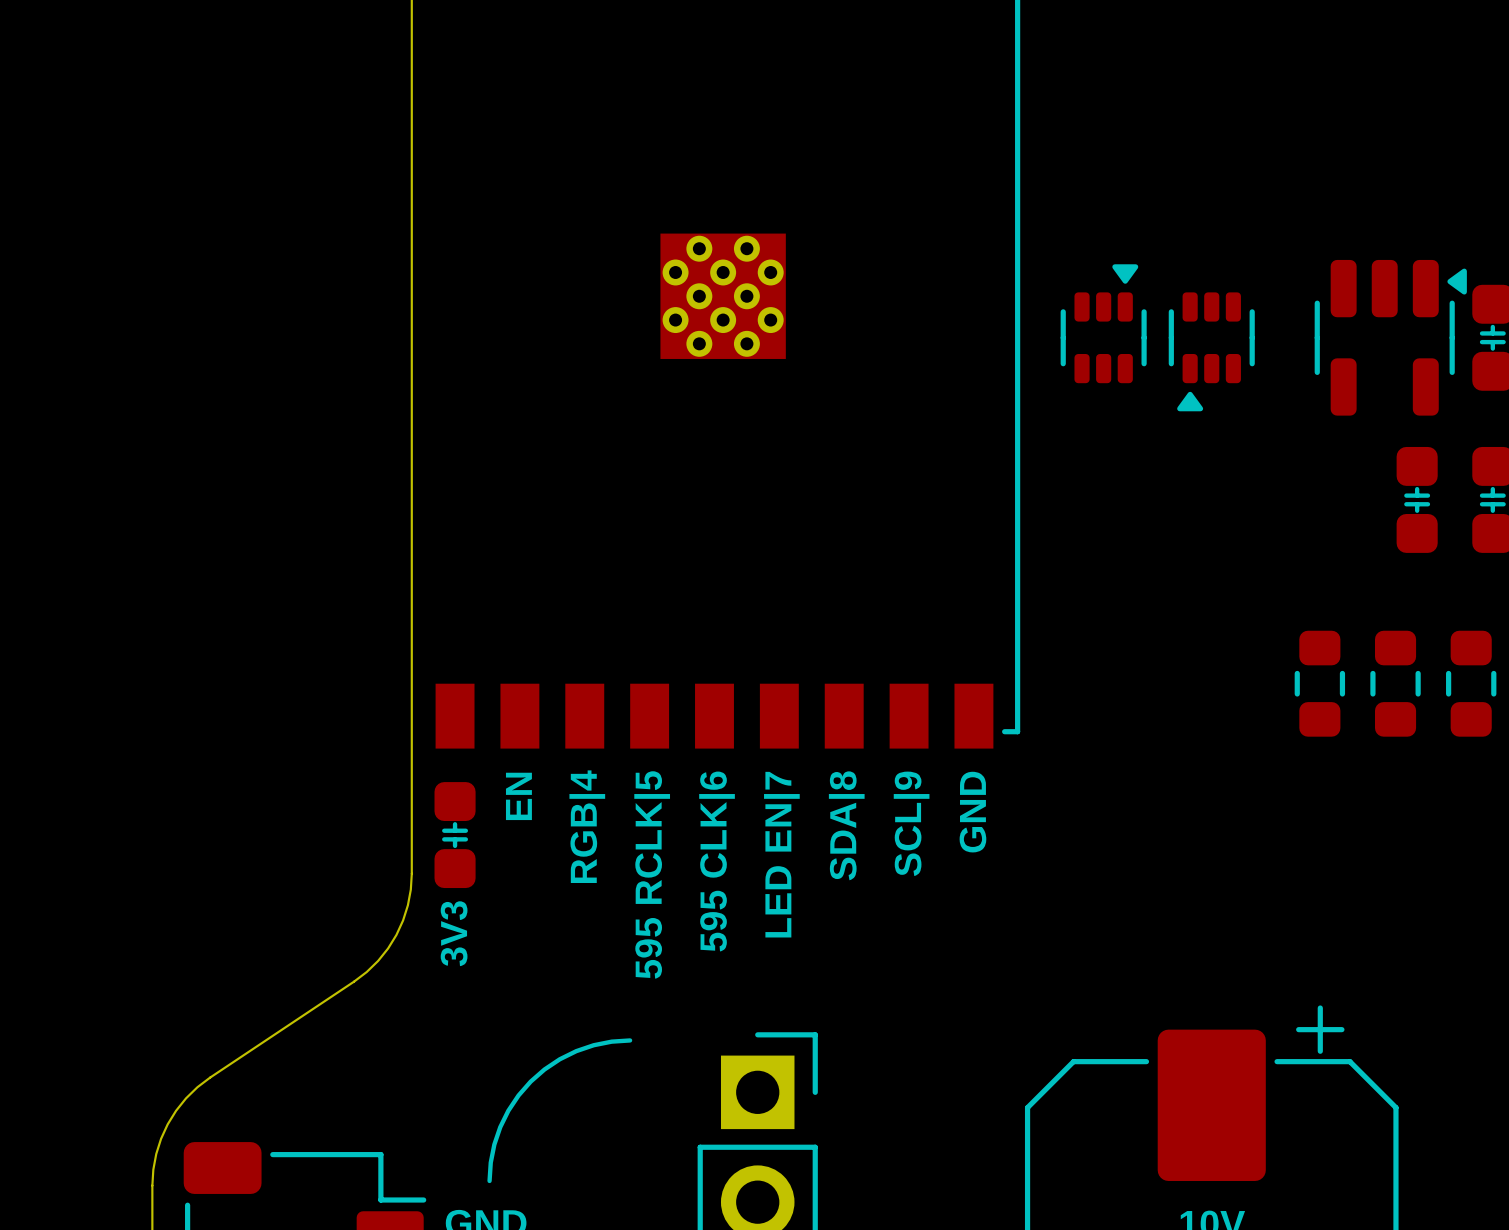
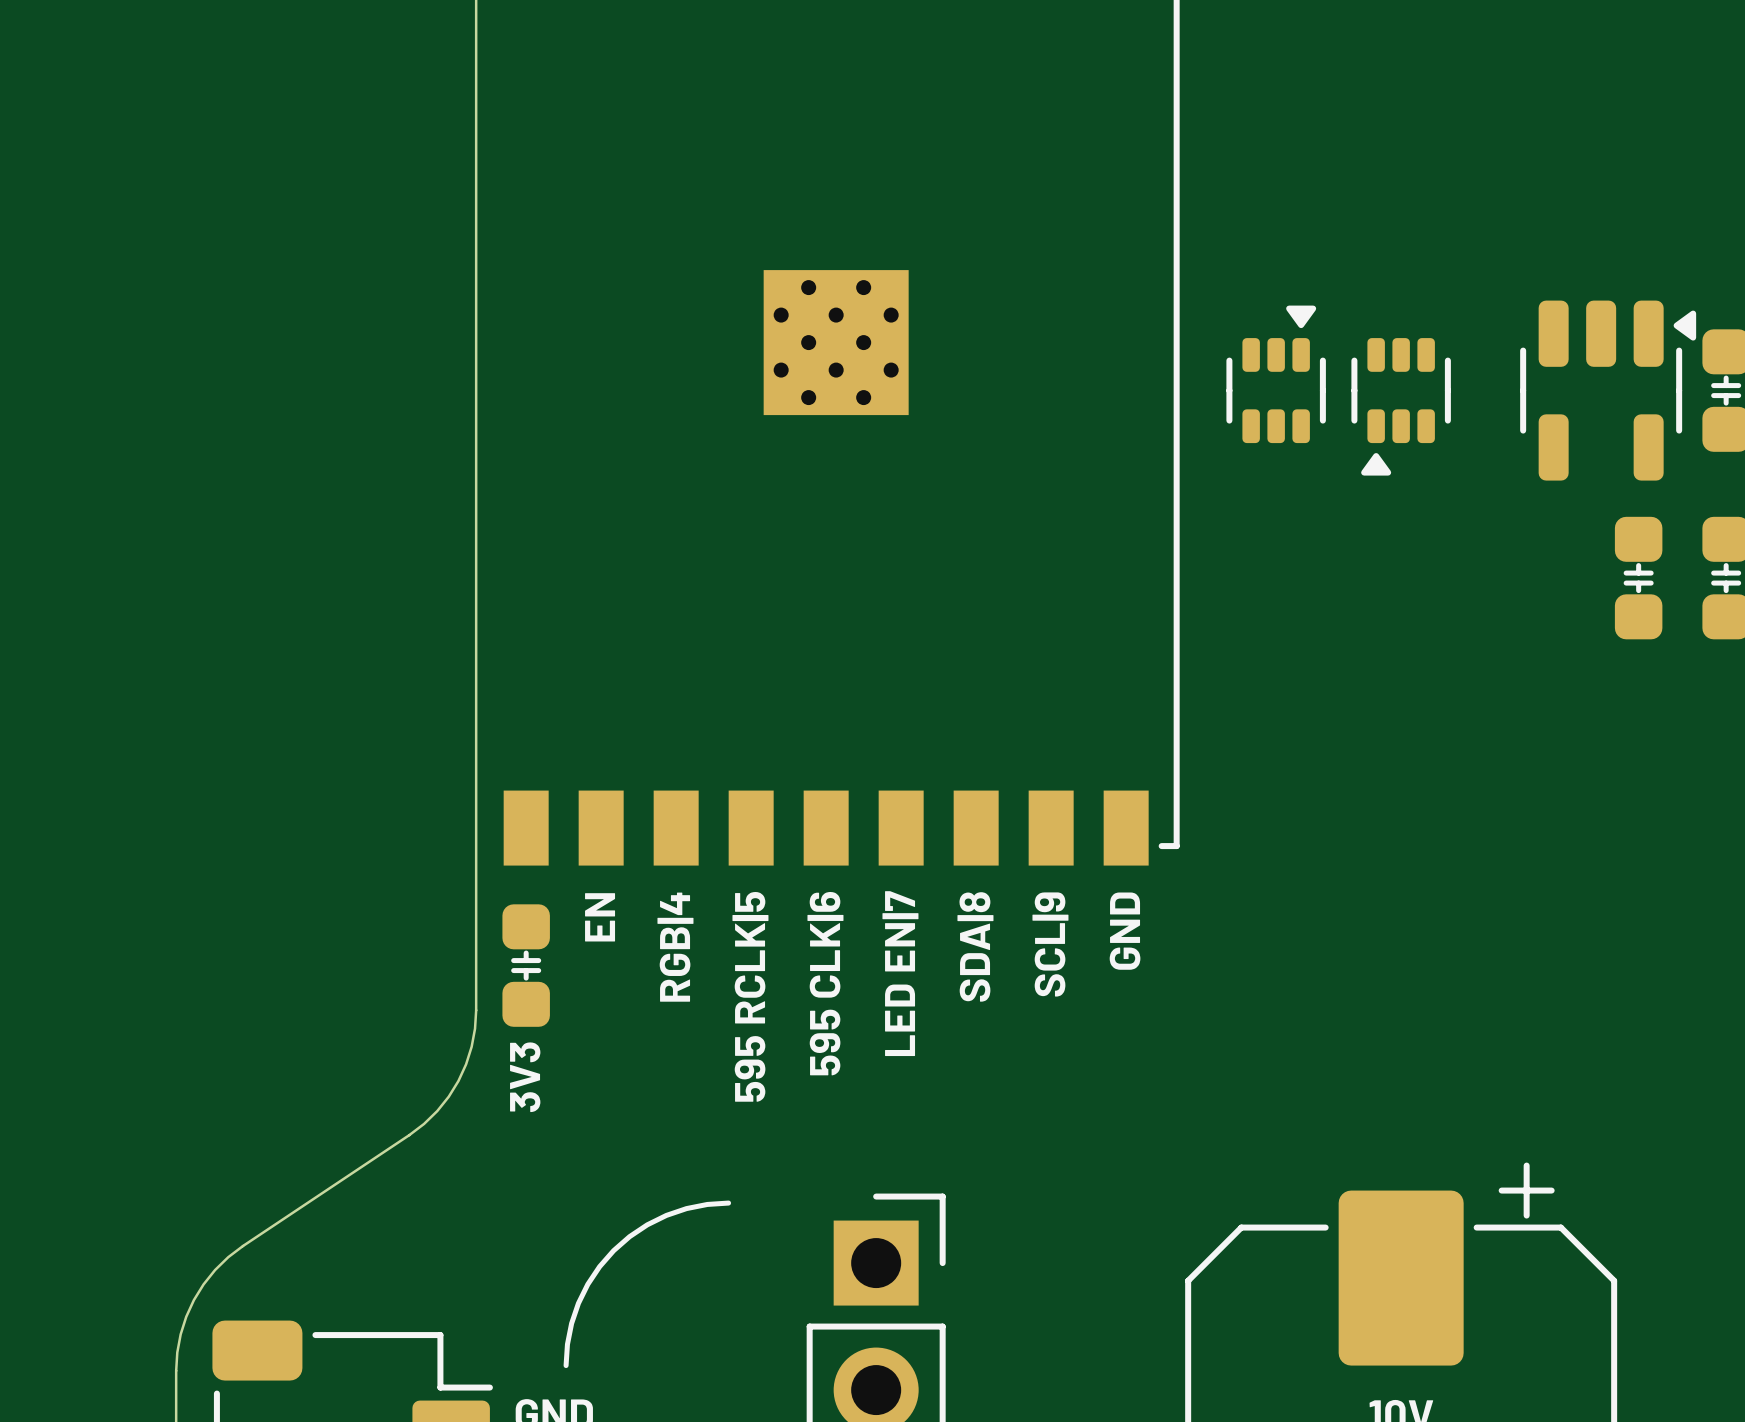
part: (1319, 683) -> none
part: (1395, 683) -> none
part: (1471, 683) -> none

